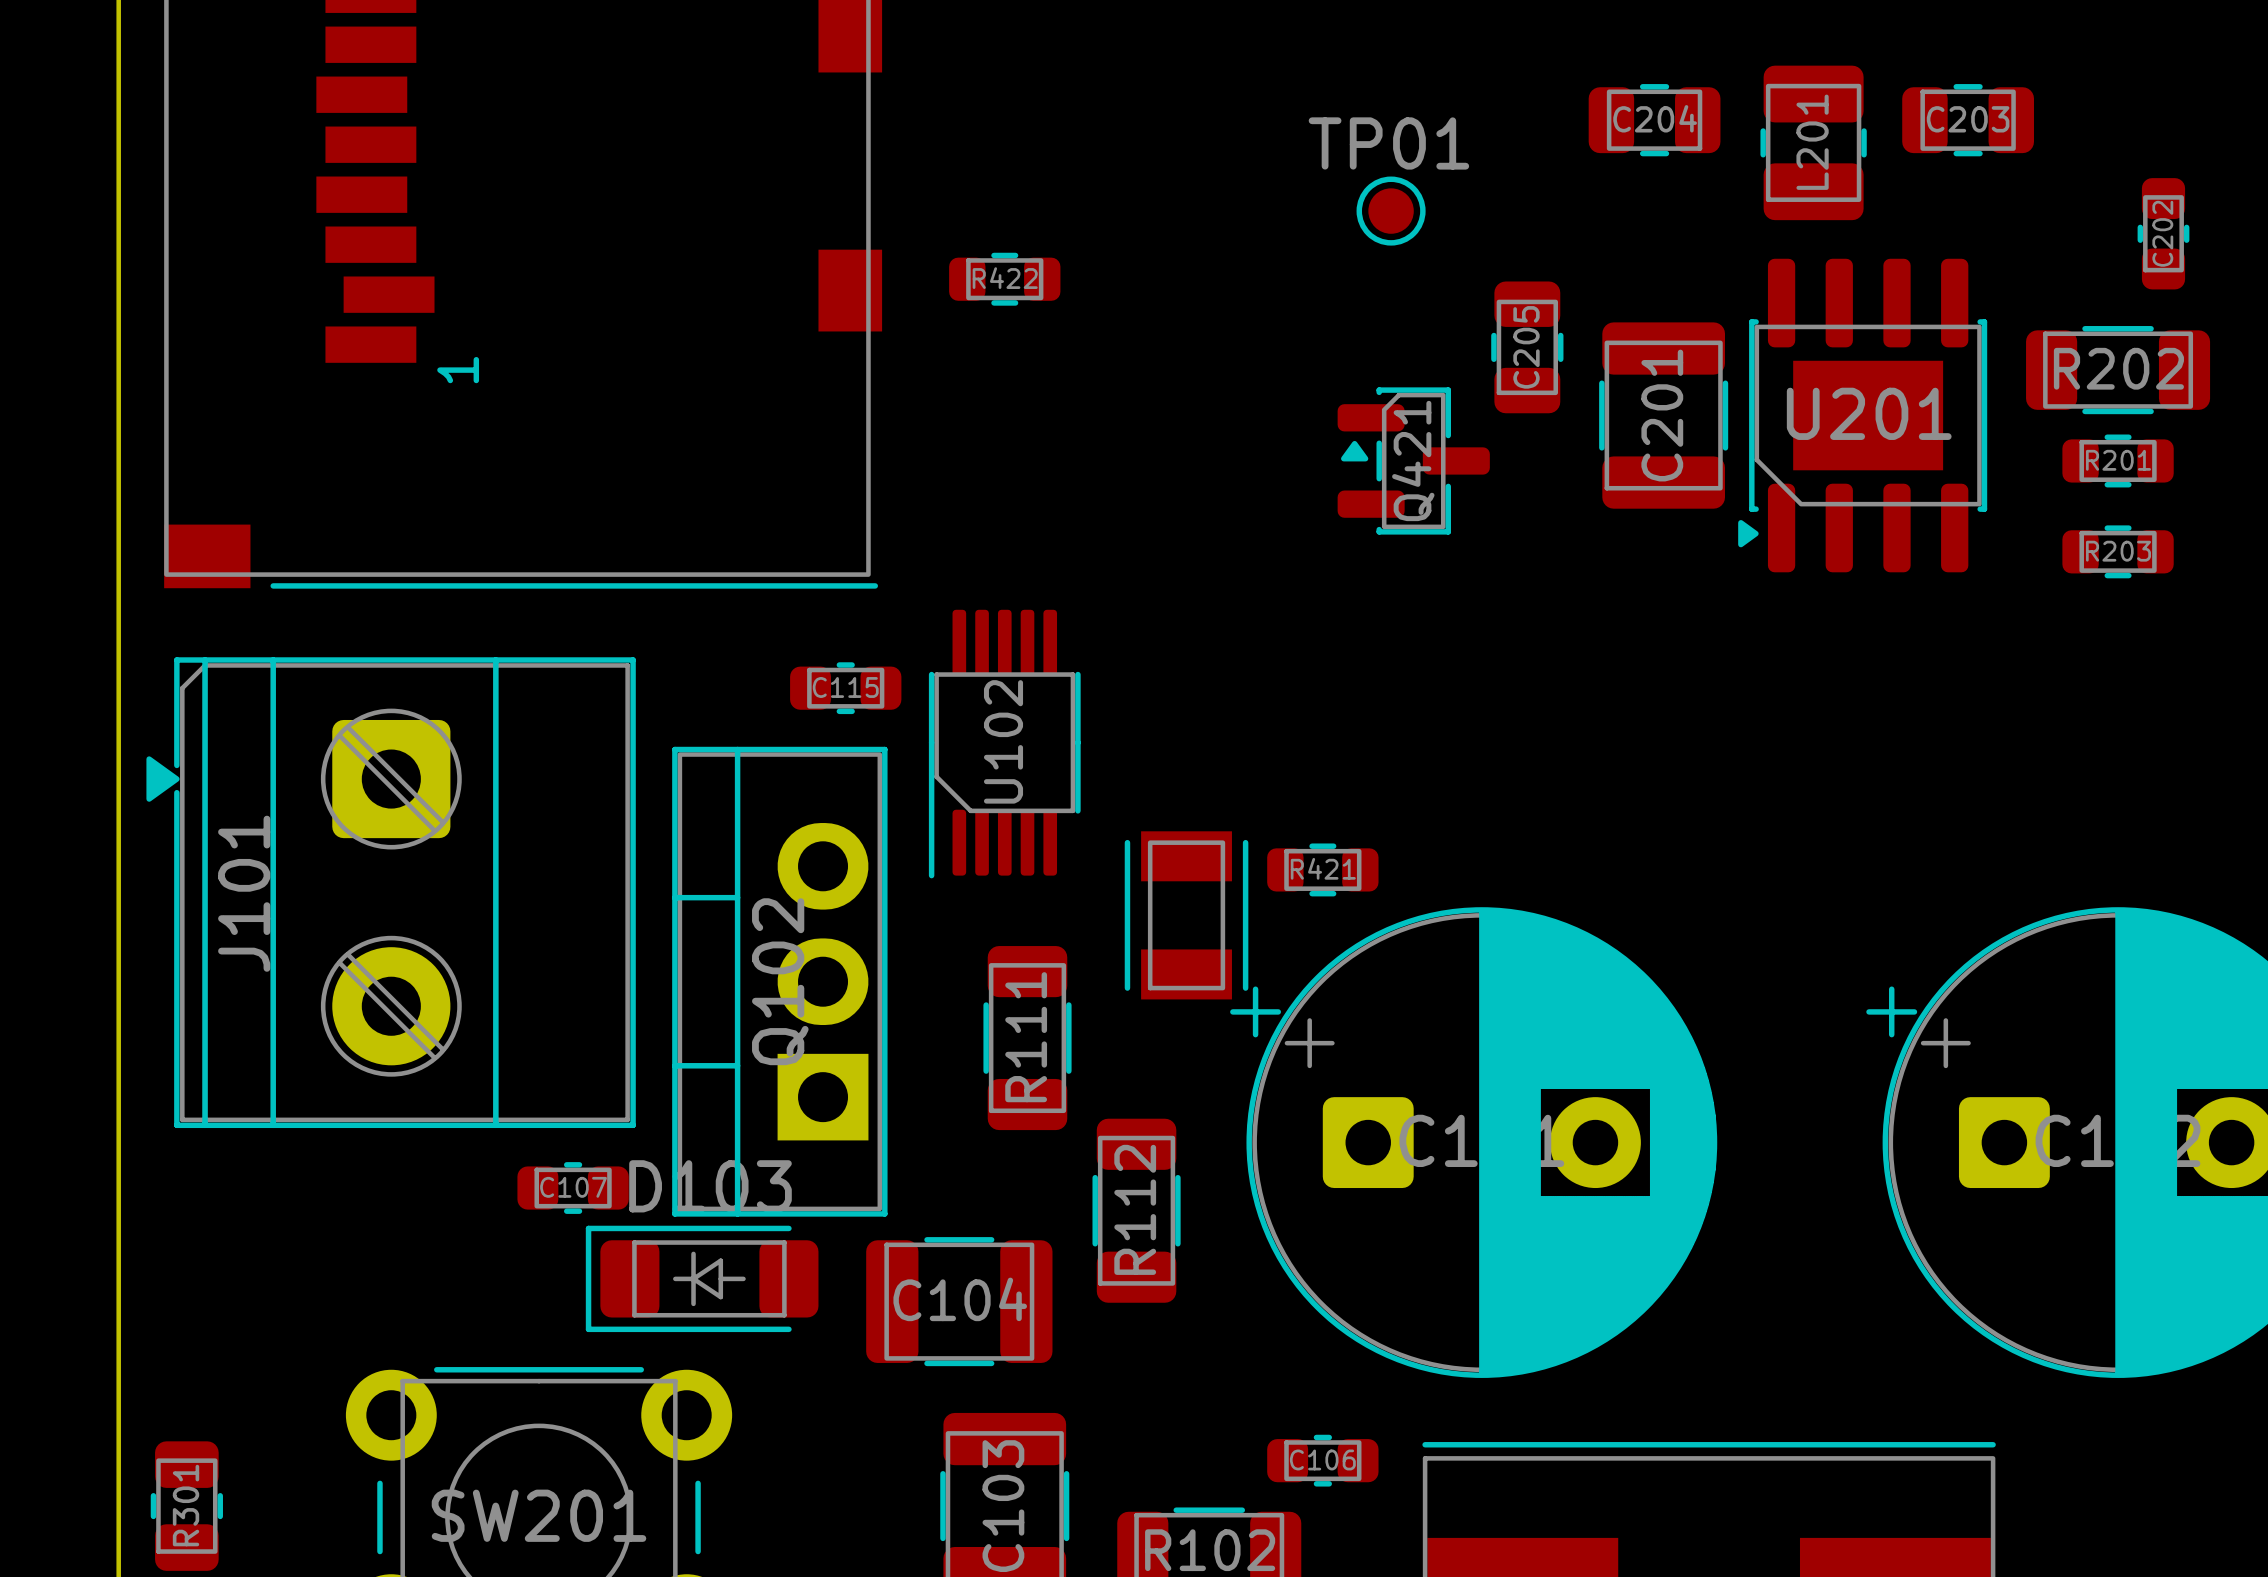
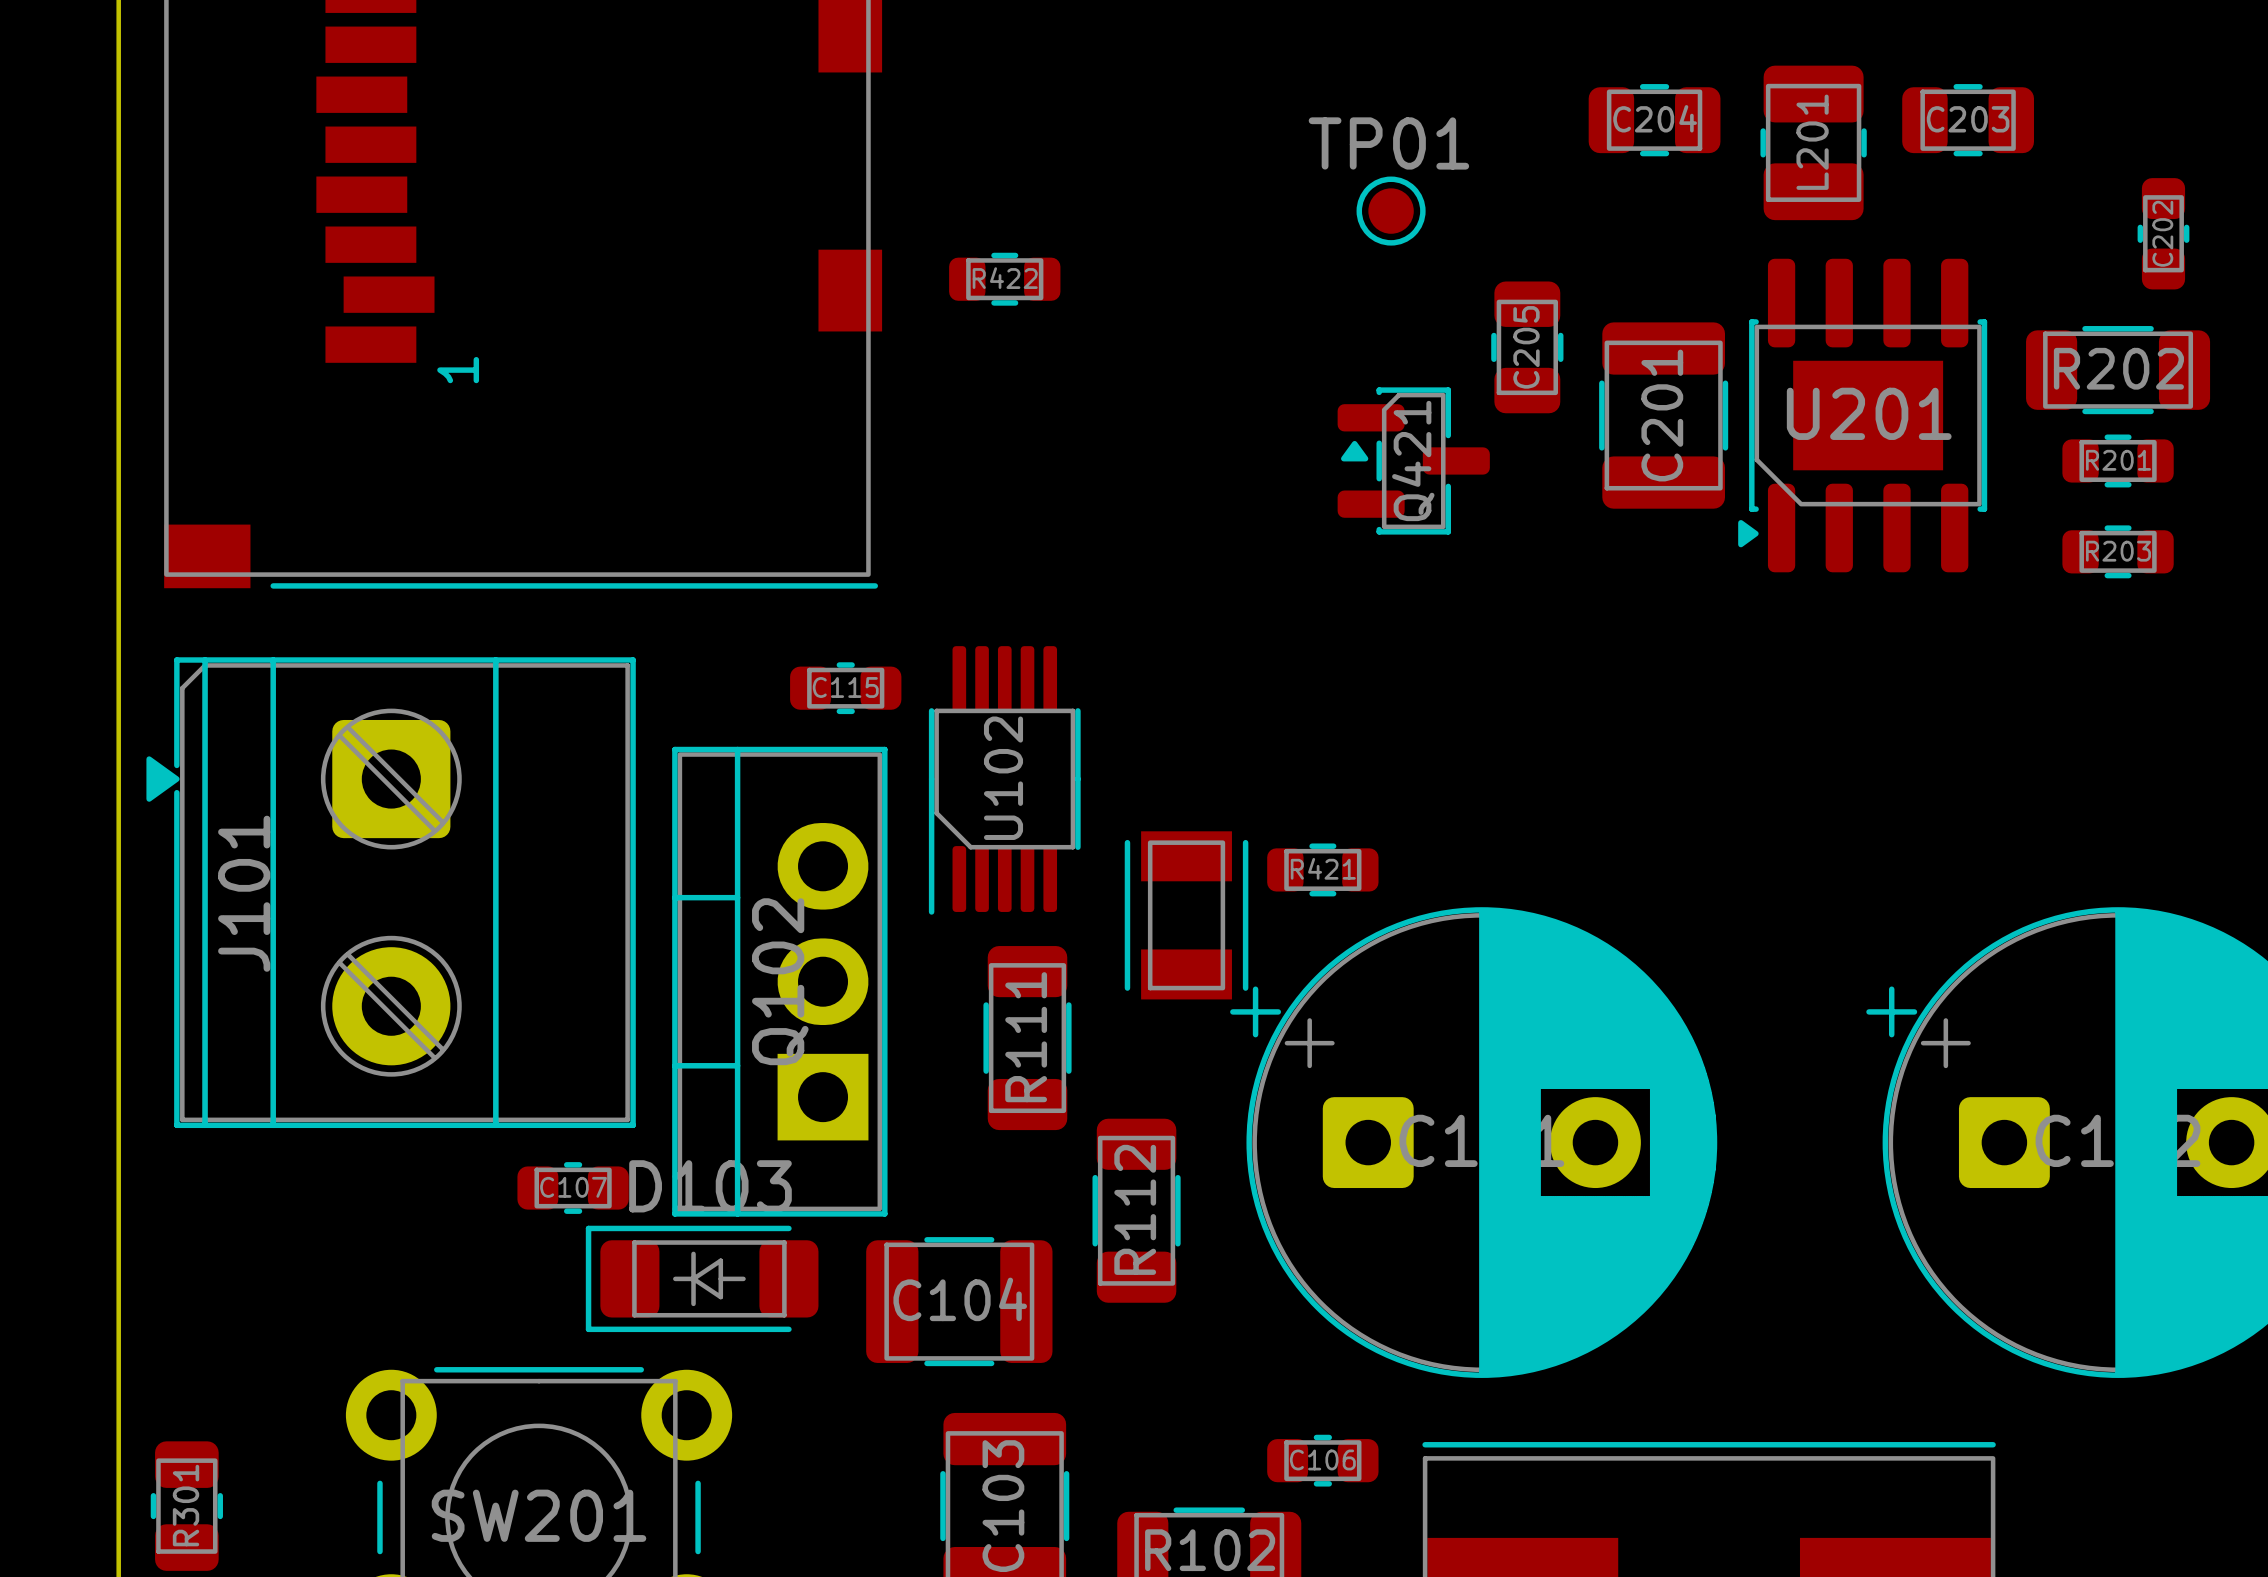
U102 position: (1004, 744) -> (1004, 780)

